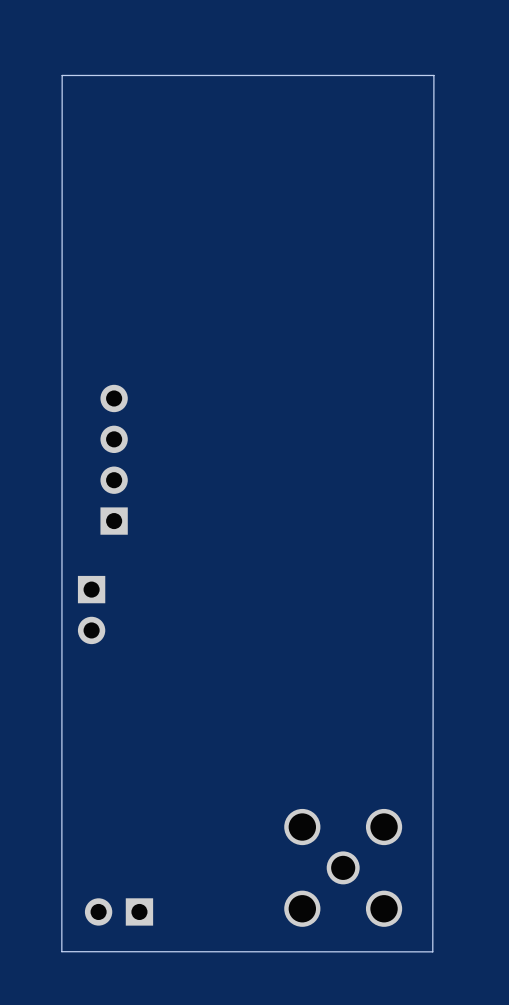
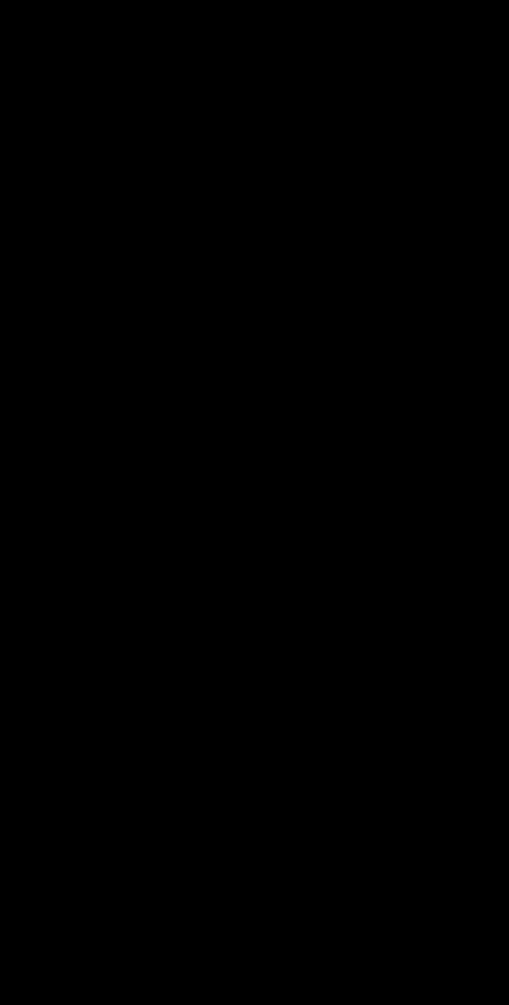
board edge: (433, 75) (62, 75) (61, 951) (432, 951) (433, 75) -> none
part: (114, 459) -> none
part: (91, 610) -> none
part: (343, 867) -> none
part: (119, 911) -> none

